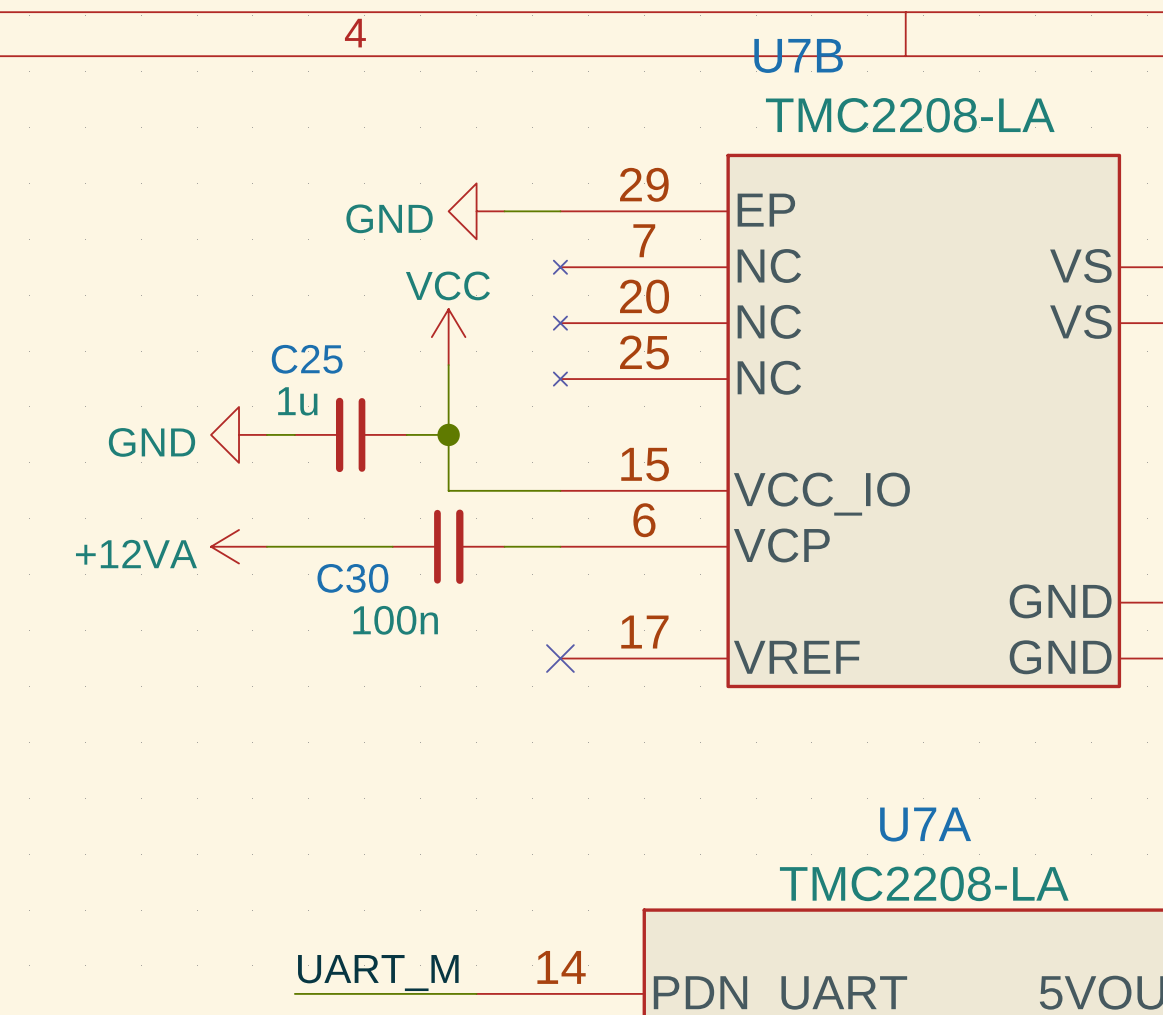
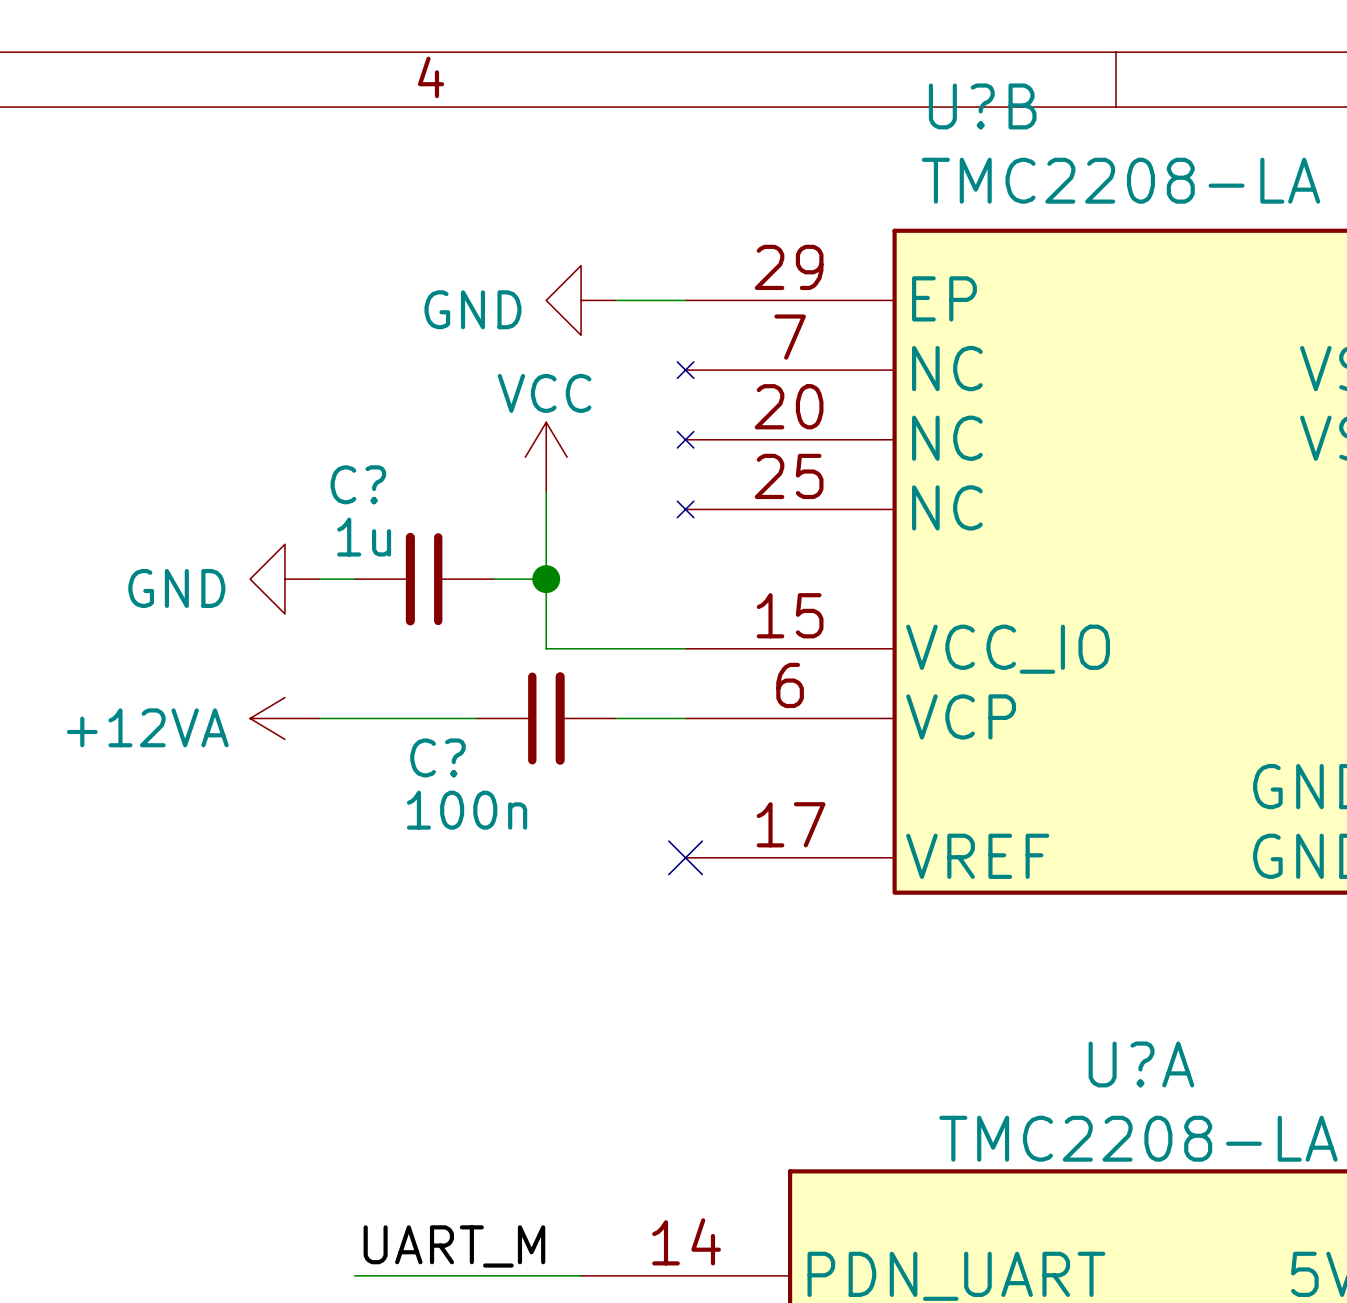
U7B name: U7B (798, 55) -> U?B (982, 106)
C25 name: C25 (307, 359) -> C? (358, 484)
C30 name: C30 (352, 578) -> C? (438, 757)
U7A name: U7A (925, 824) -> U?A (1141, 1064)

